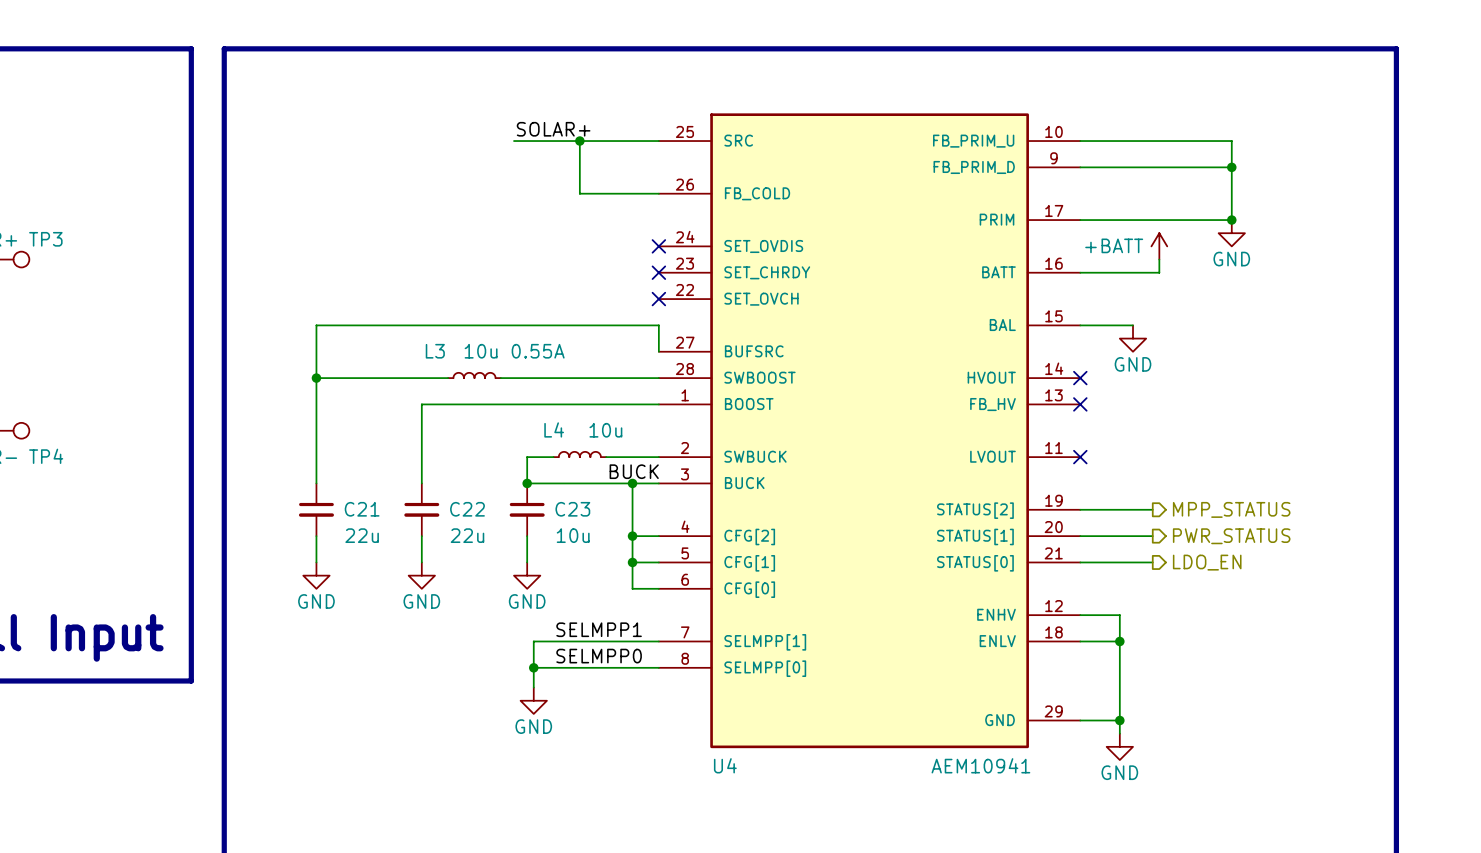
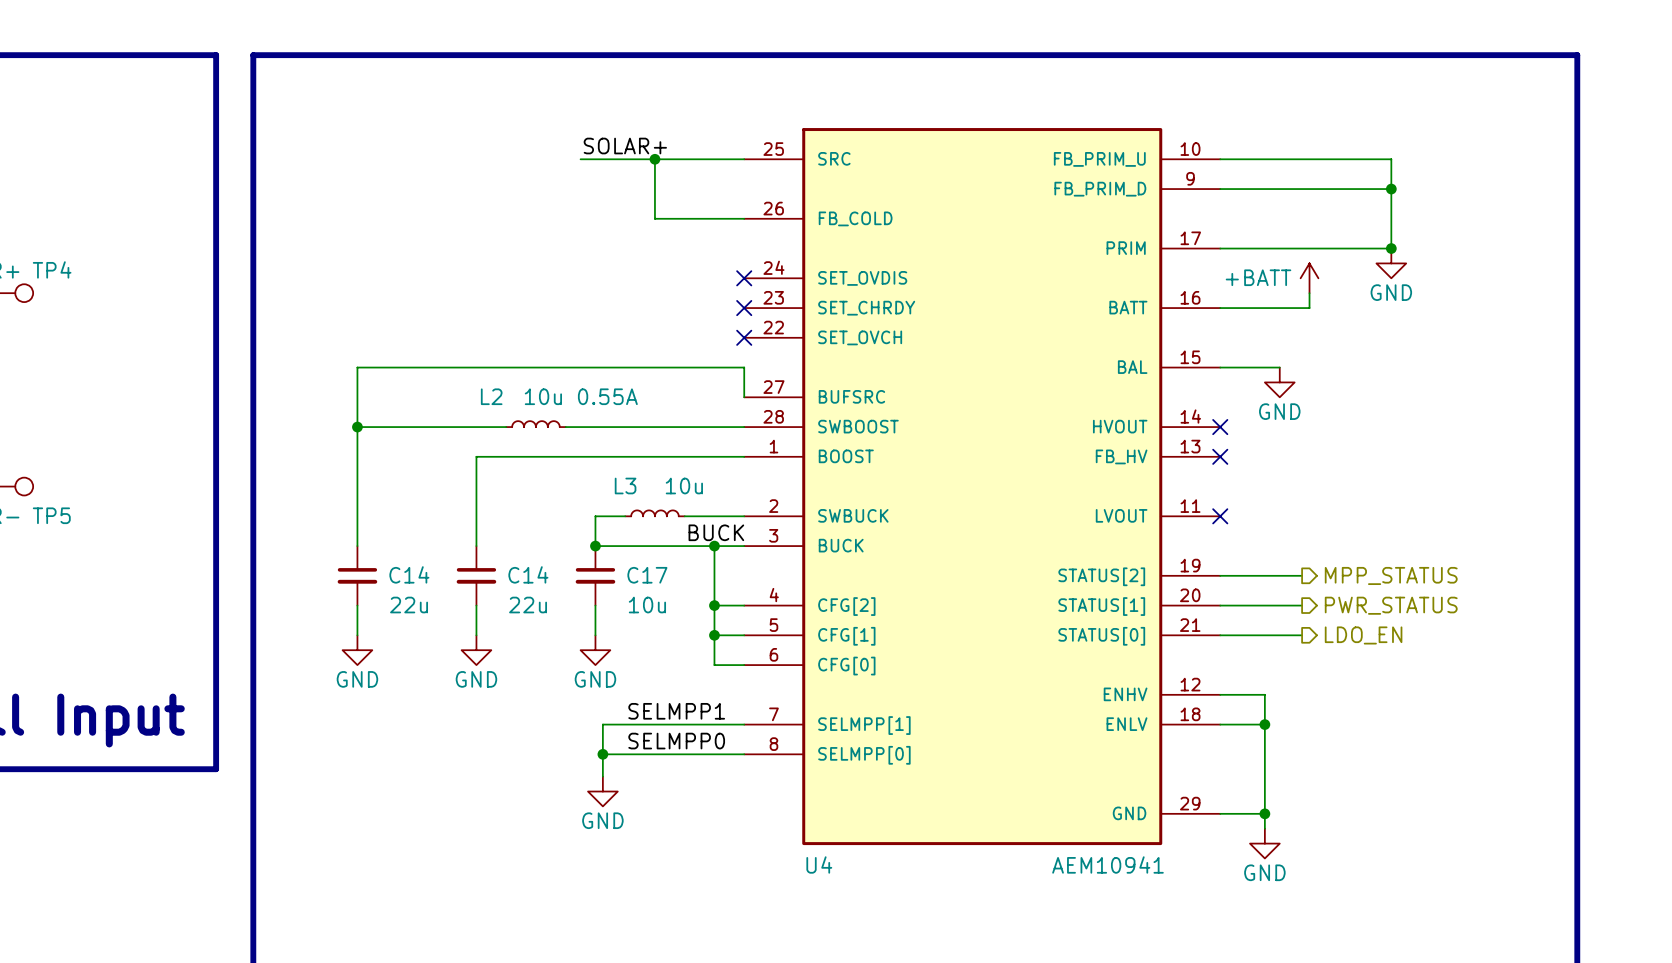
TP3 name: TP3 (45, 239) -> TP4 (52, 269)
L3 name: L3 (435, 351) -> L2 (491, 396)
L4 name: L4 (554, 429) -> L3 (625, 486)
TP4 name: TP4 (46, 456) -> TP5 (51, 515)
C21 name: C21 (362, 509) -> C14 (409, 574)
C22 name: C22 (467, 509) -> C14 (528, 574)
C23 name: C23 (572, 509) -> C17 (647, 575)

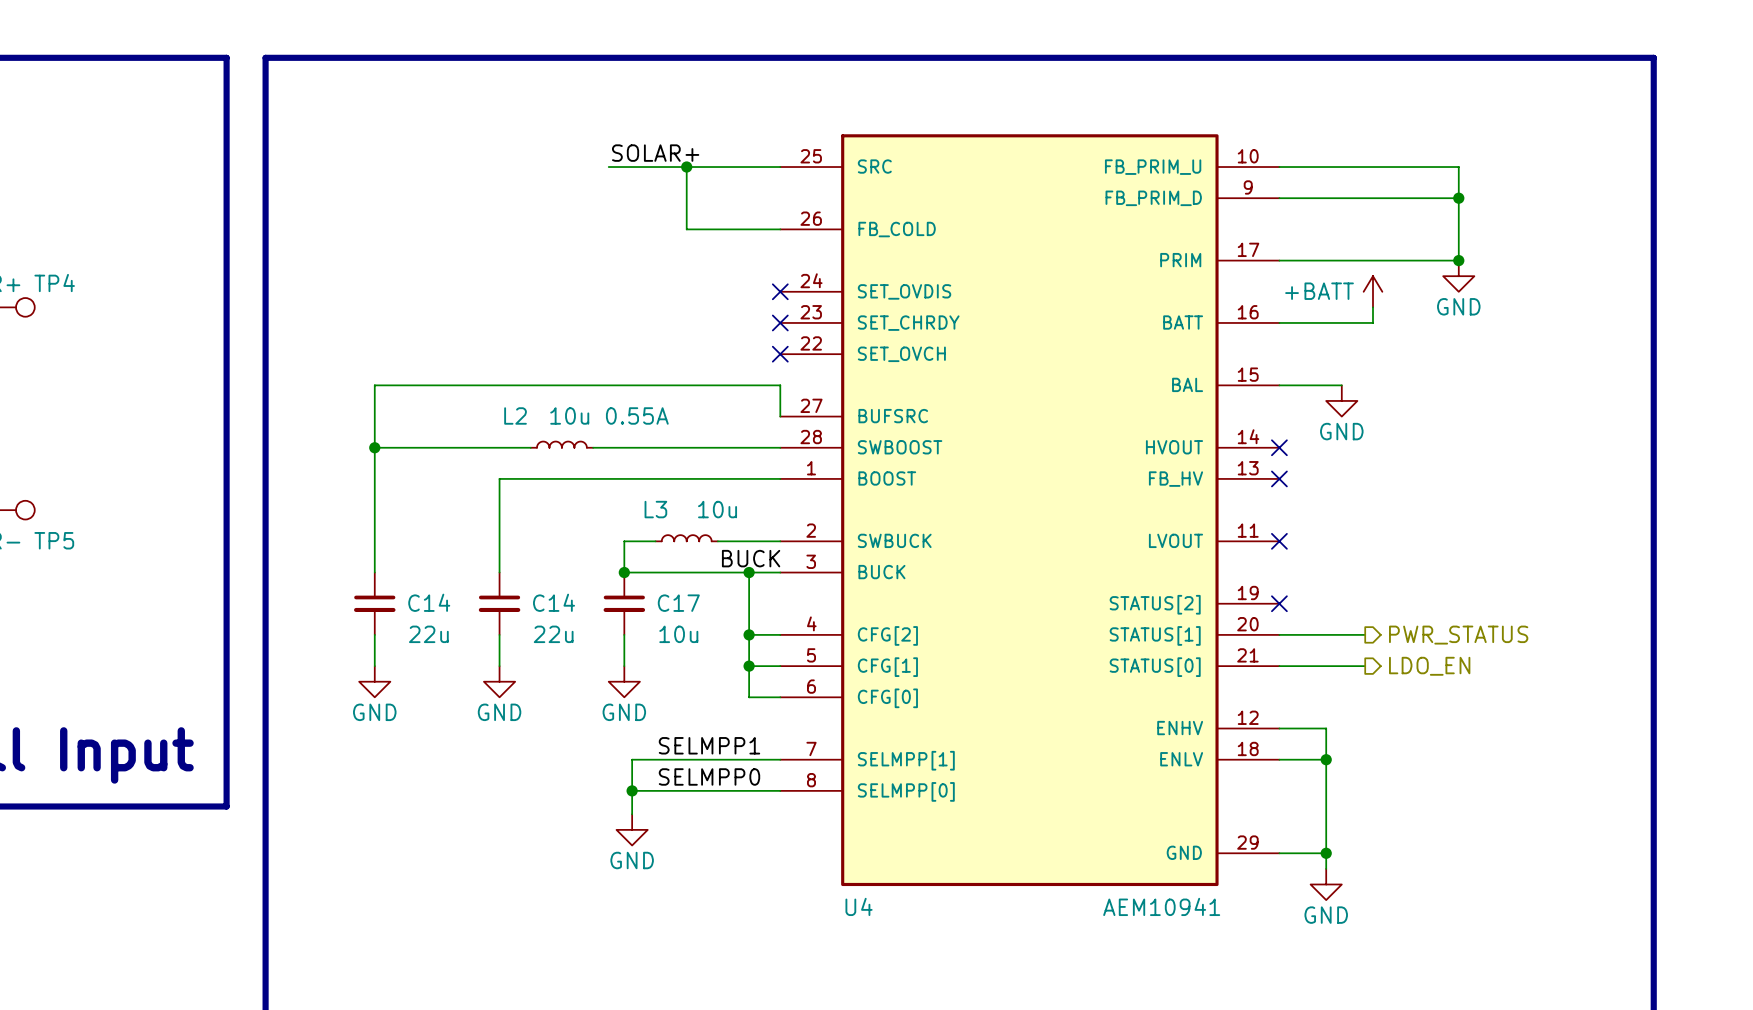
wire: (1220, 575) (1302, 575) -> none
no-connect mark: none -> (1279, 603)
hierarchical label: MPP_STATUS (1391, 575) -> none

